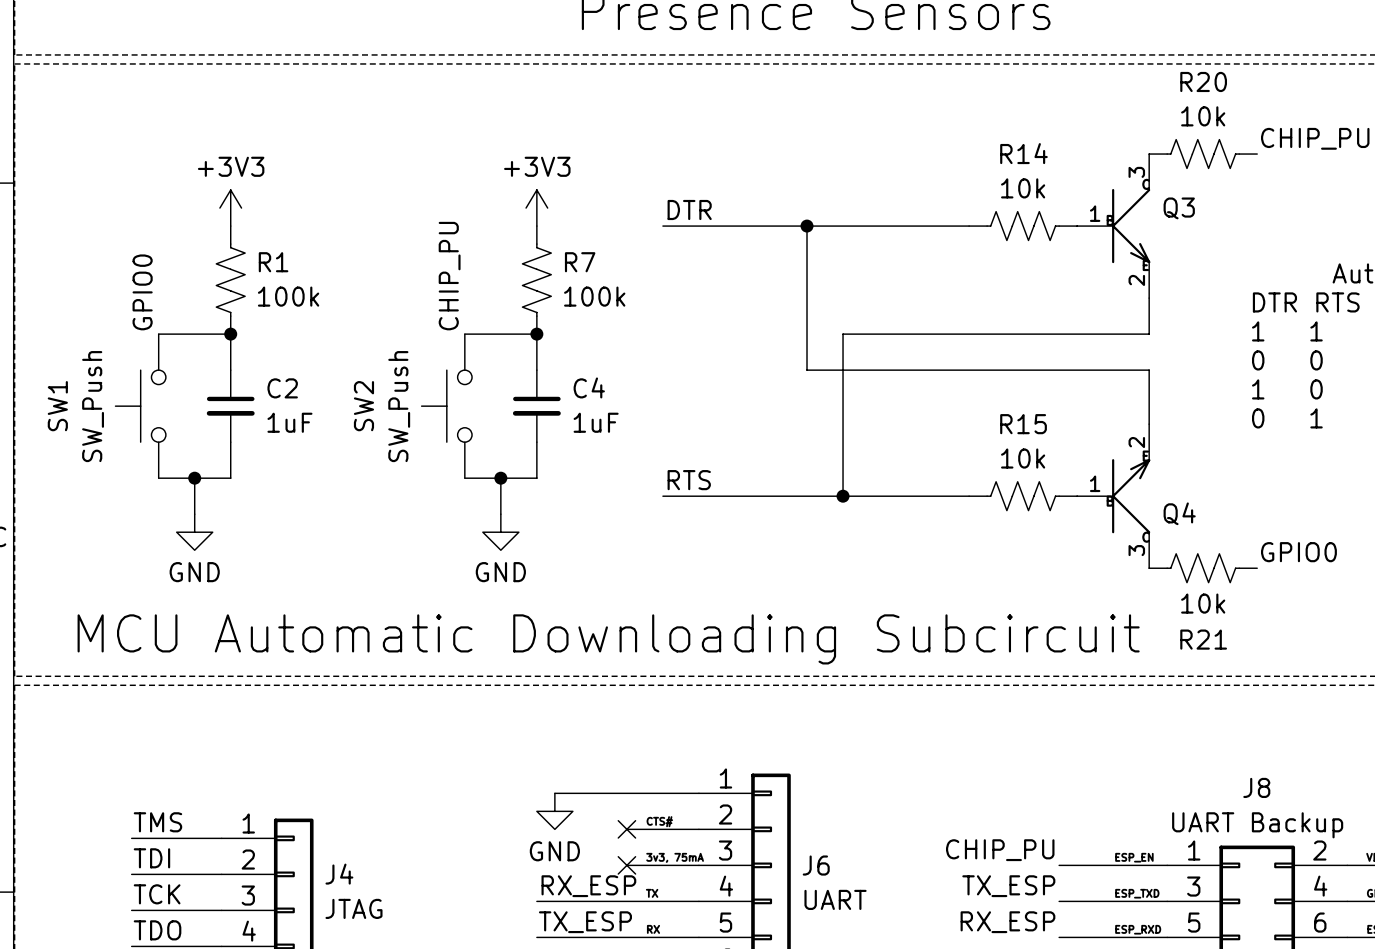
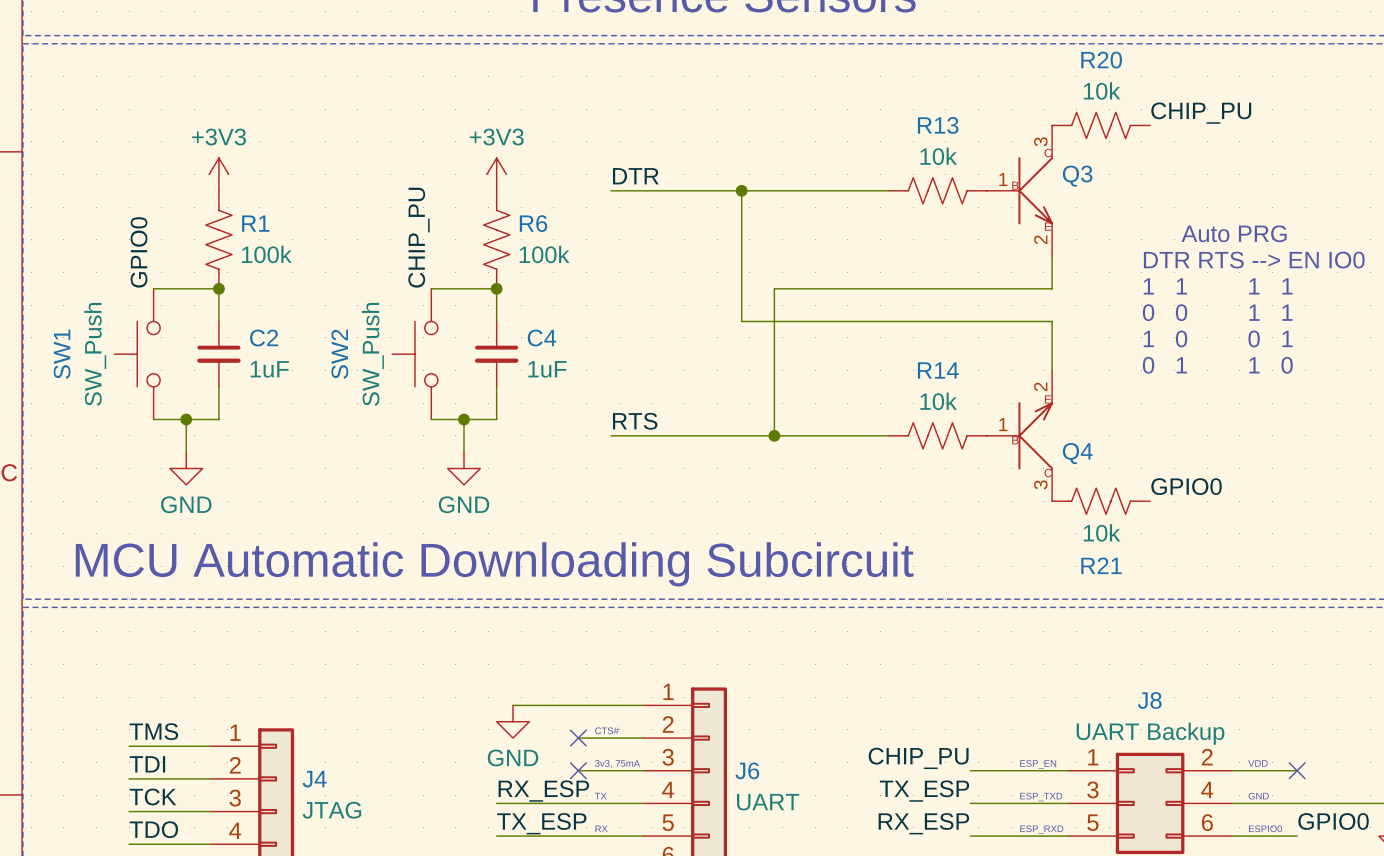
R14 name: R14 (1023, 153) -> R13 (938, 125)
R7 name: R7 (580, 262) -> R6 (533, 223)
R15 name: R15 (1023, 424) -> R14 (938, 370)

